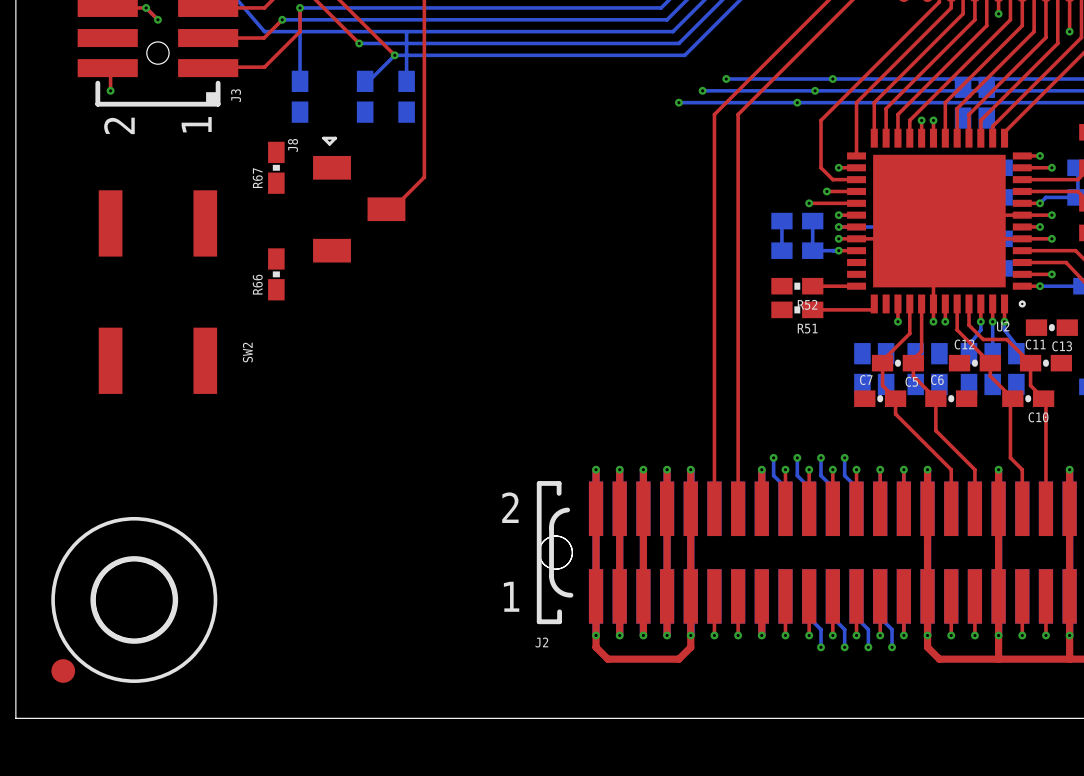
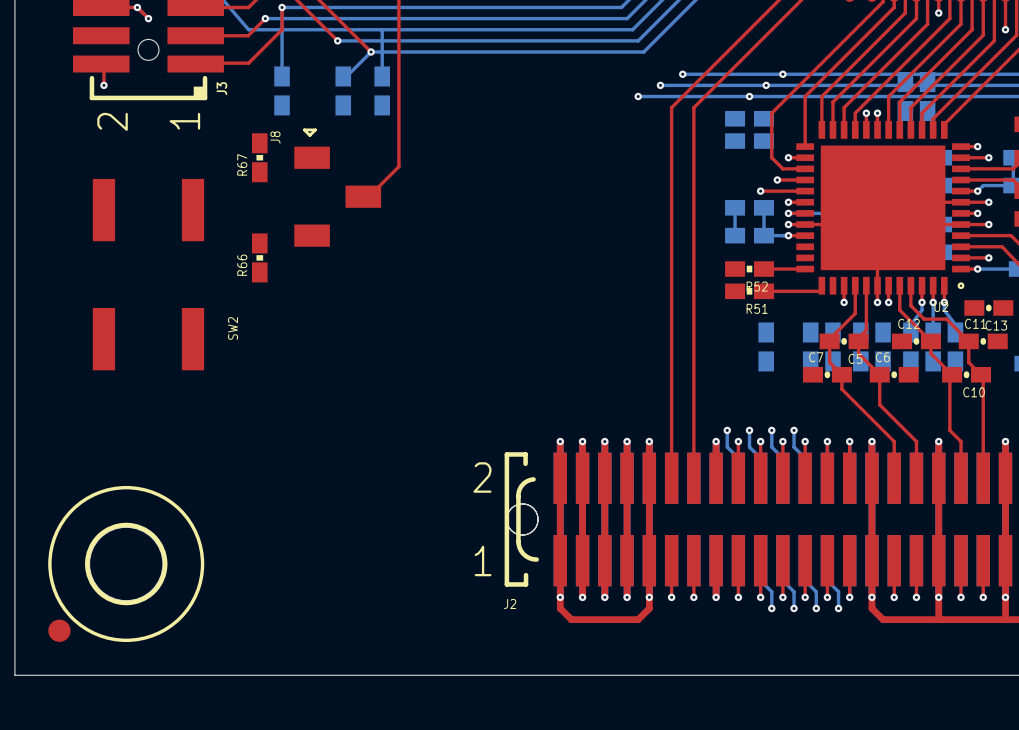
part: none -> (749, 118)
part: none -> (749, 141)
part: none -> (766, 346)

